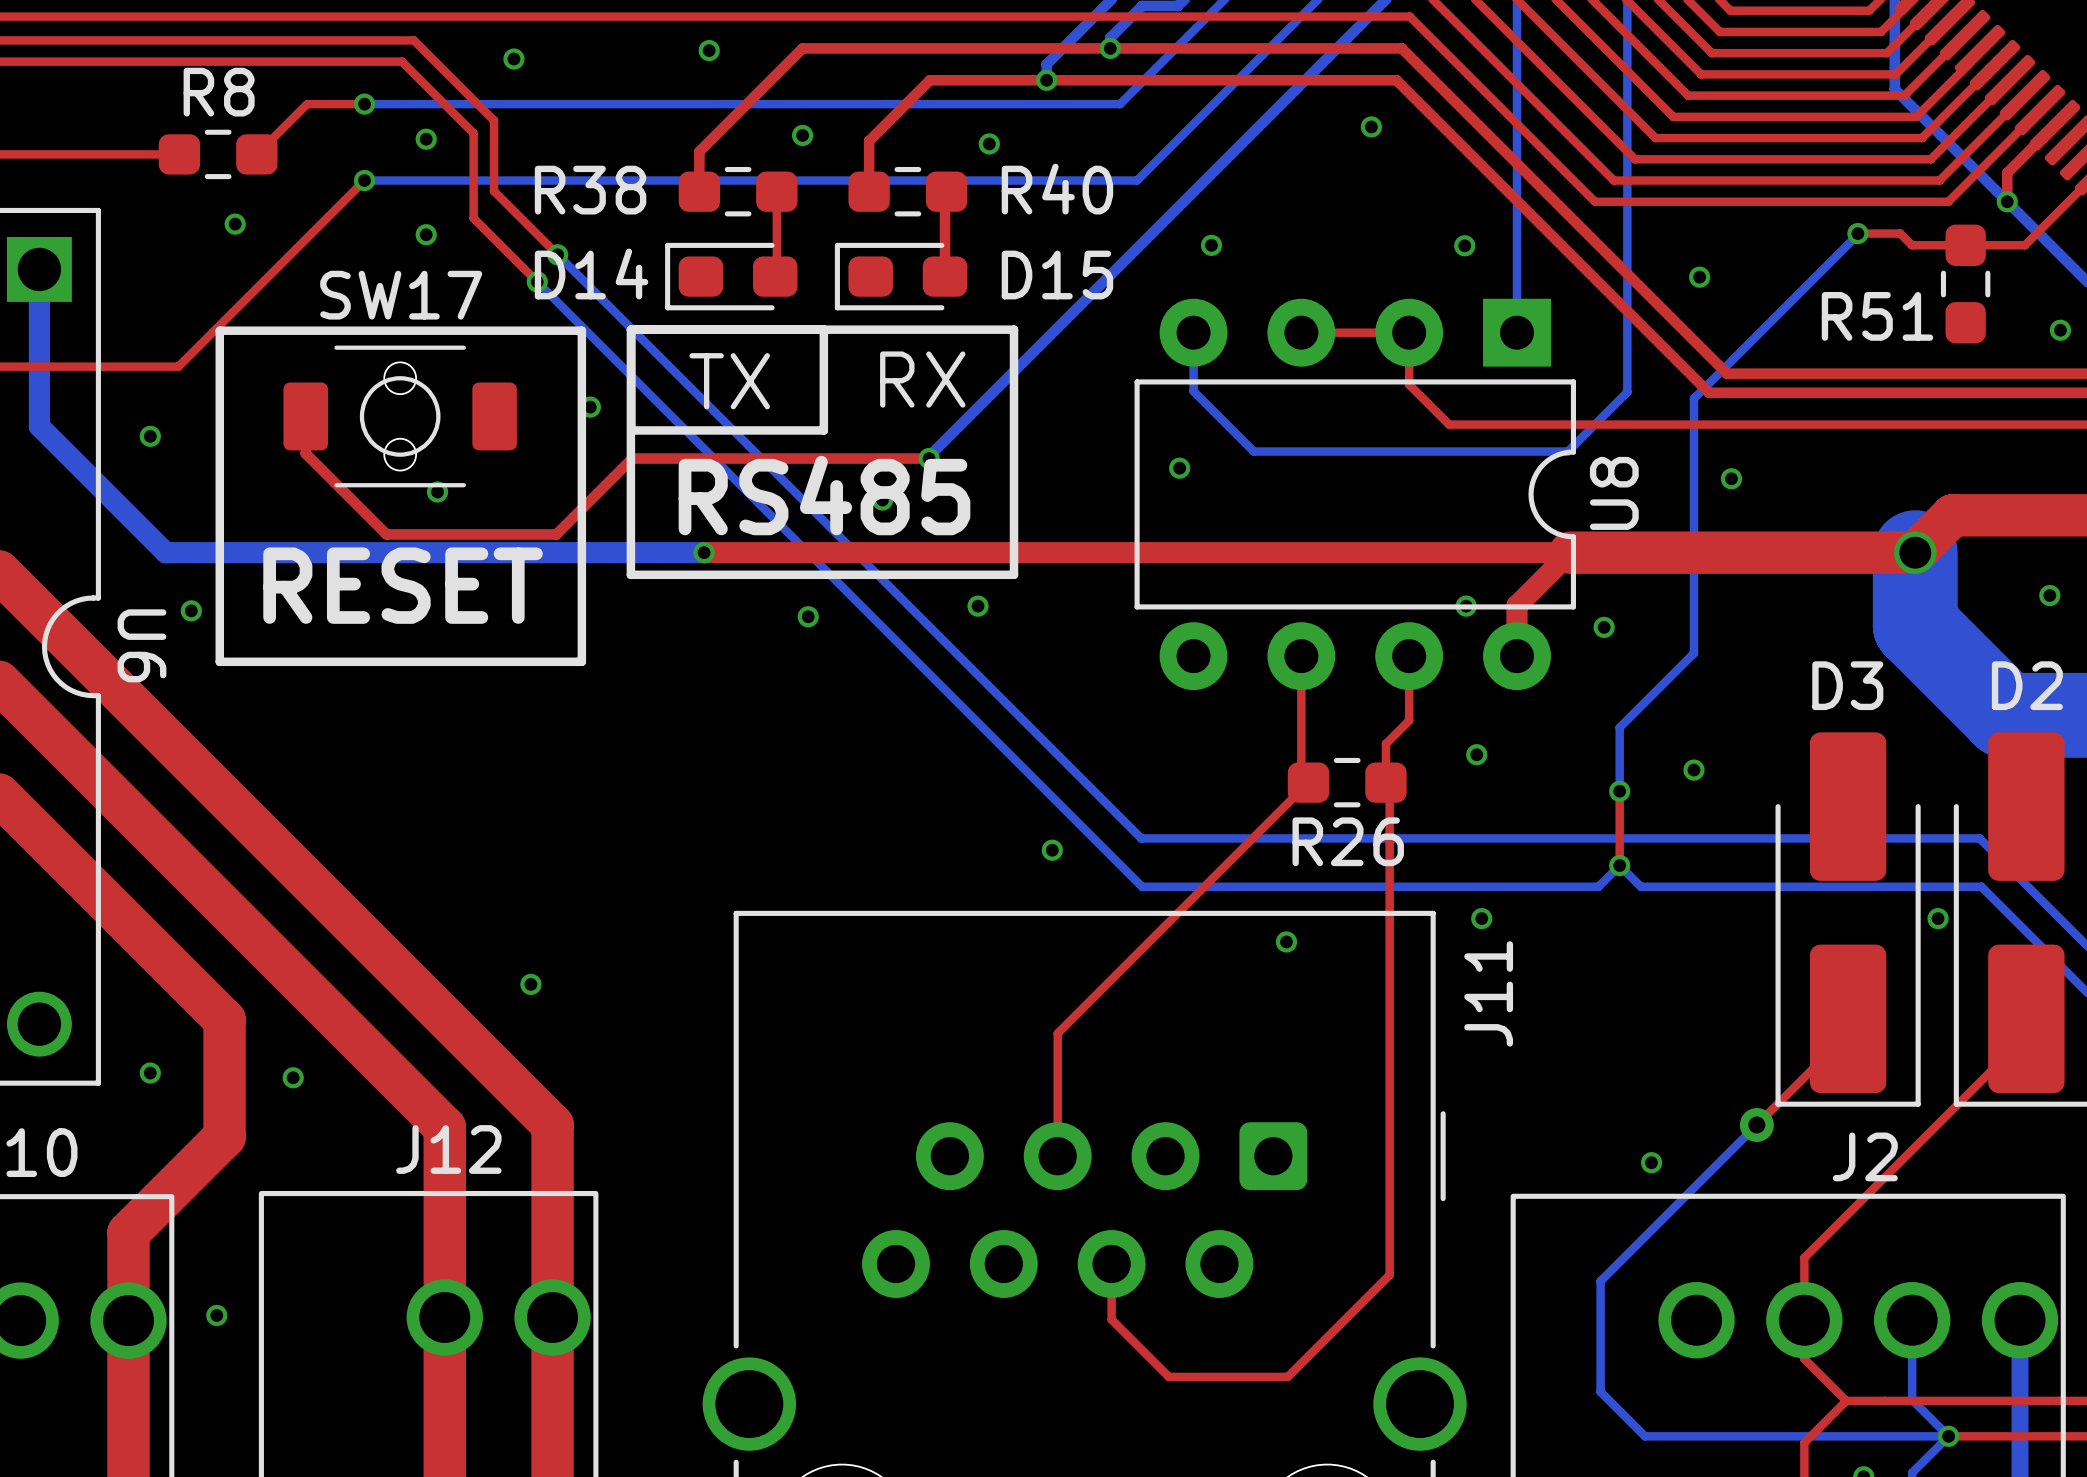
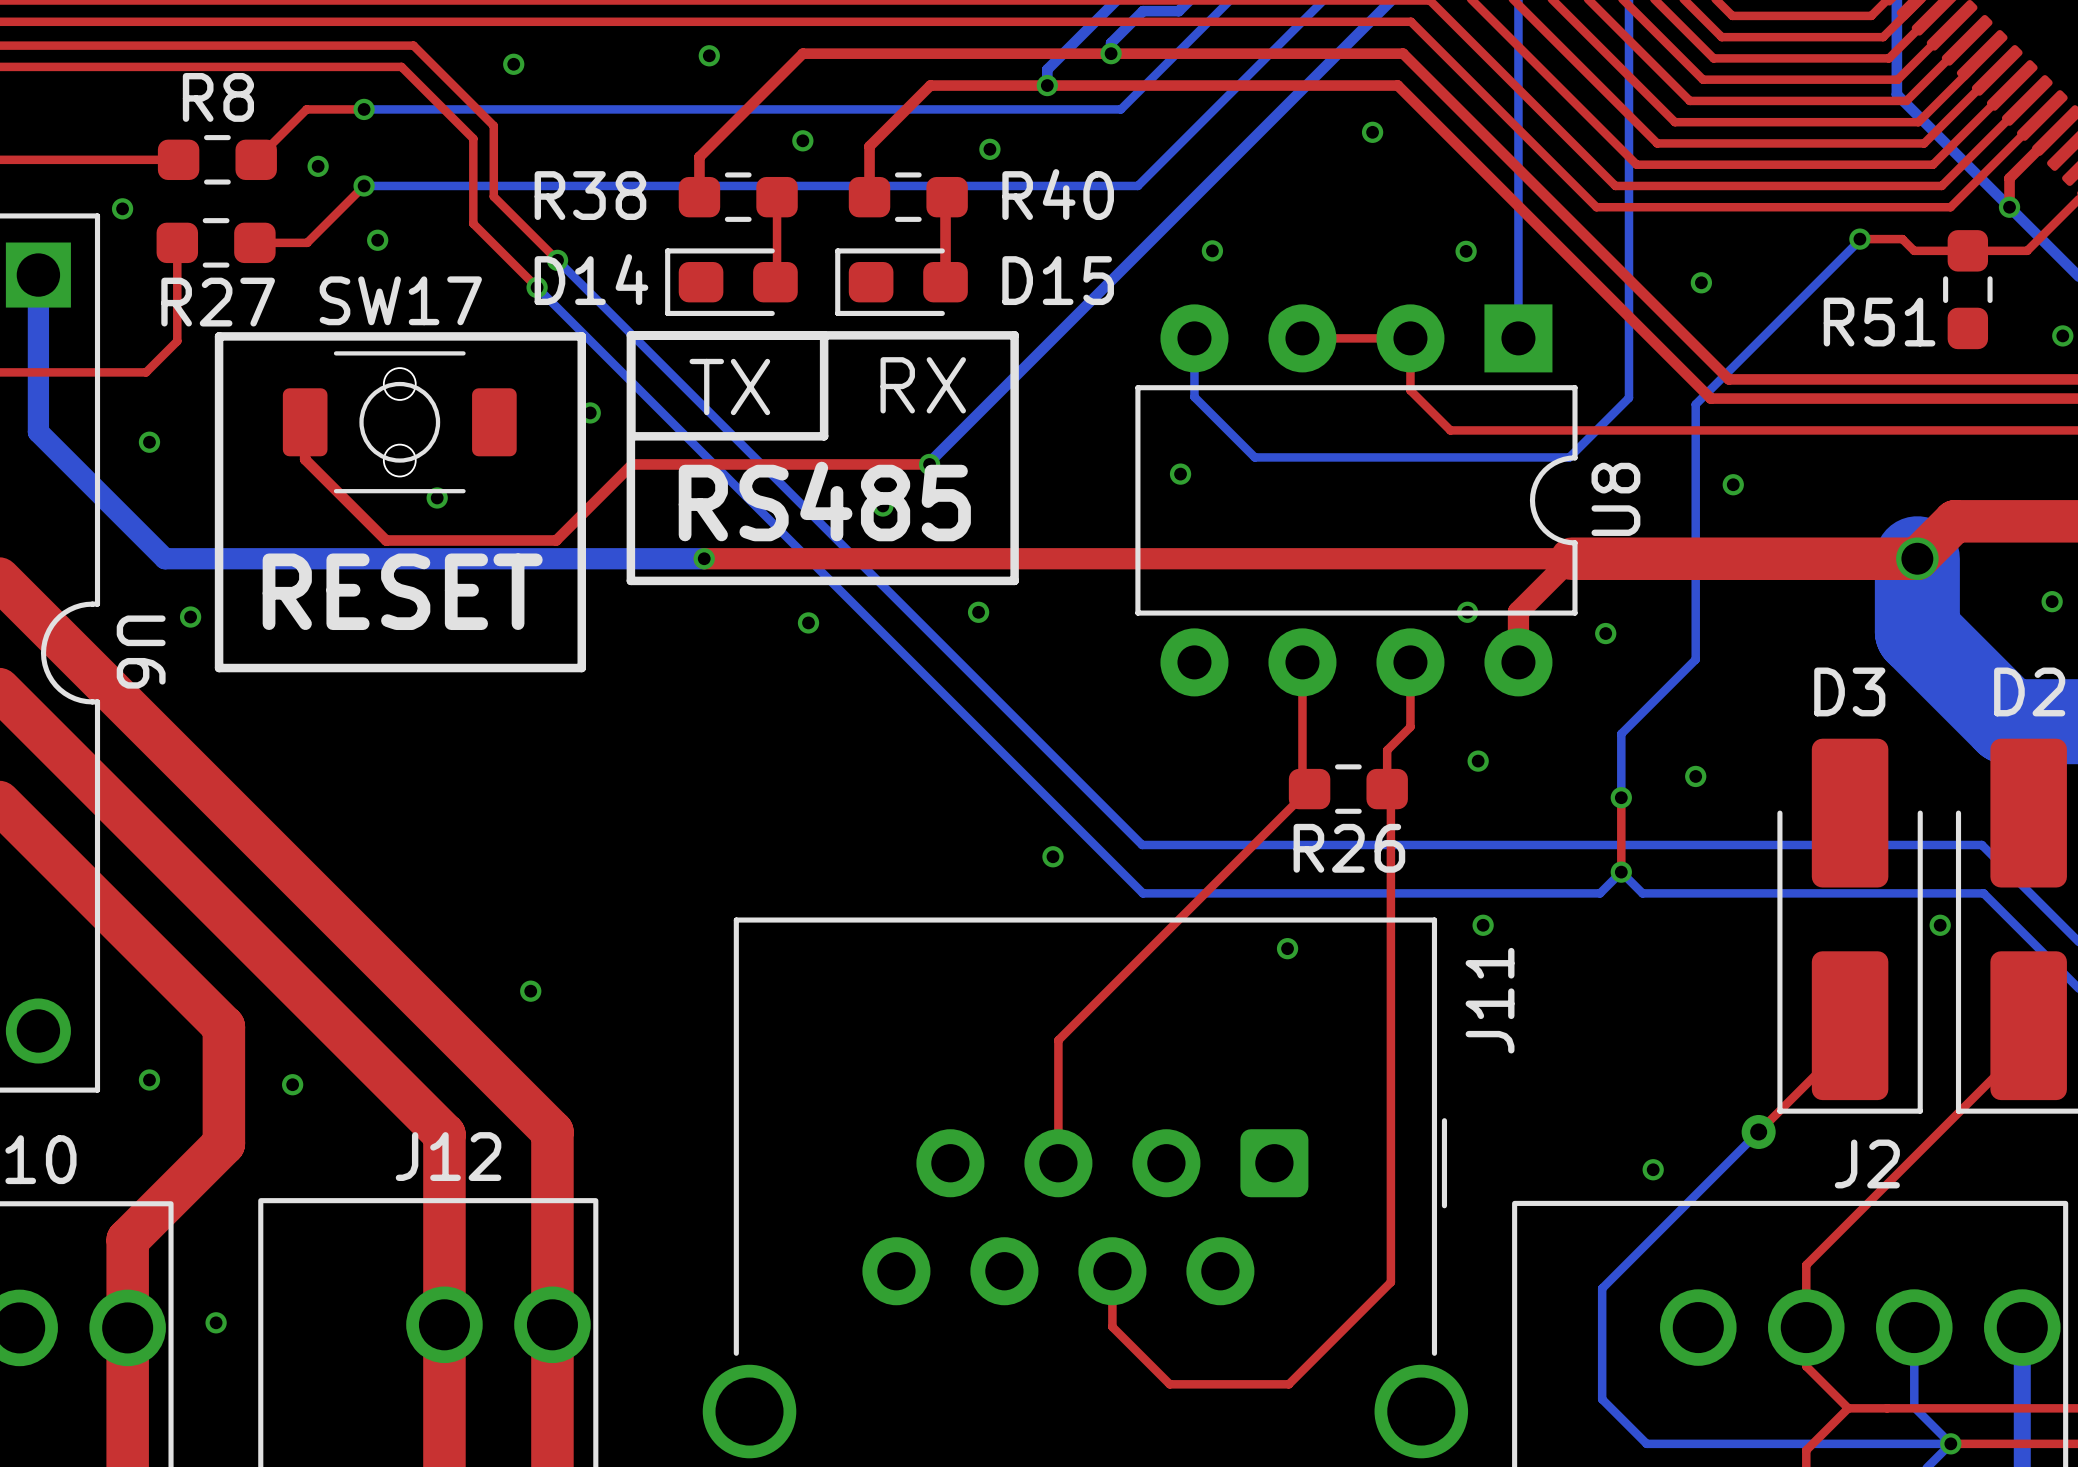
via: (426, 139) -> none
via: none -> (318, 166)
via: none -> (122, 208)
via: (235, 224) -> none
via position: (426, 234) -> (377, 240)
R27: none -> (216, 242)
top track: none -> (254, 242) (307, 242)
top track: (307, 237) (178, 366) (146, 366) -> (177, 242) (177, 341) (146, 372)

